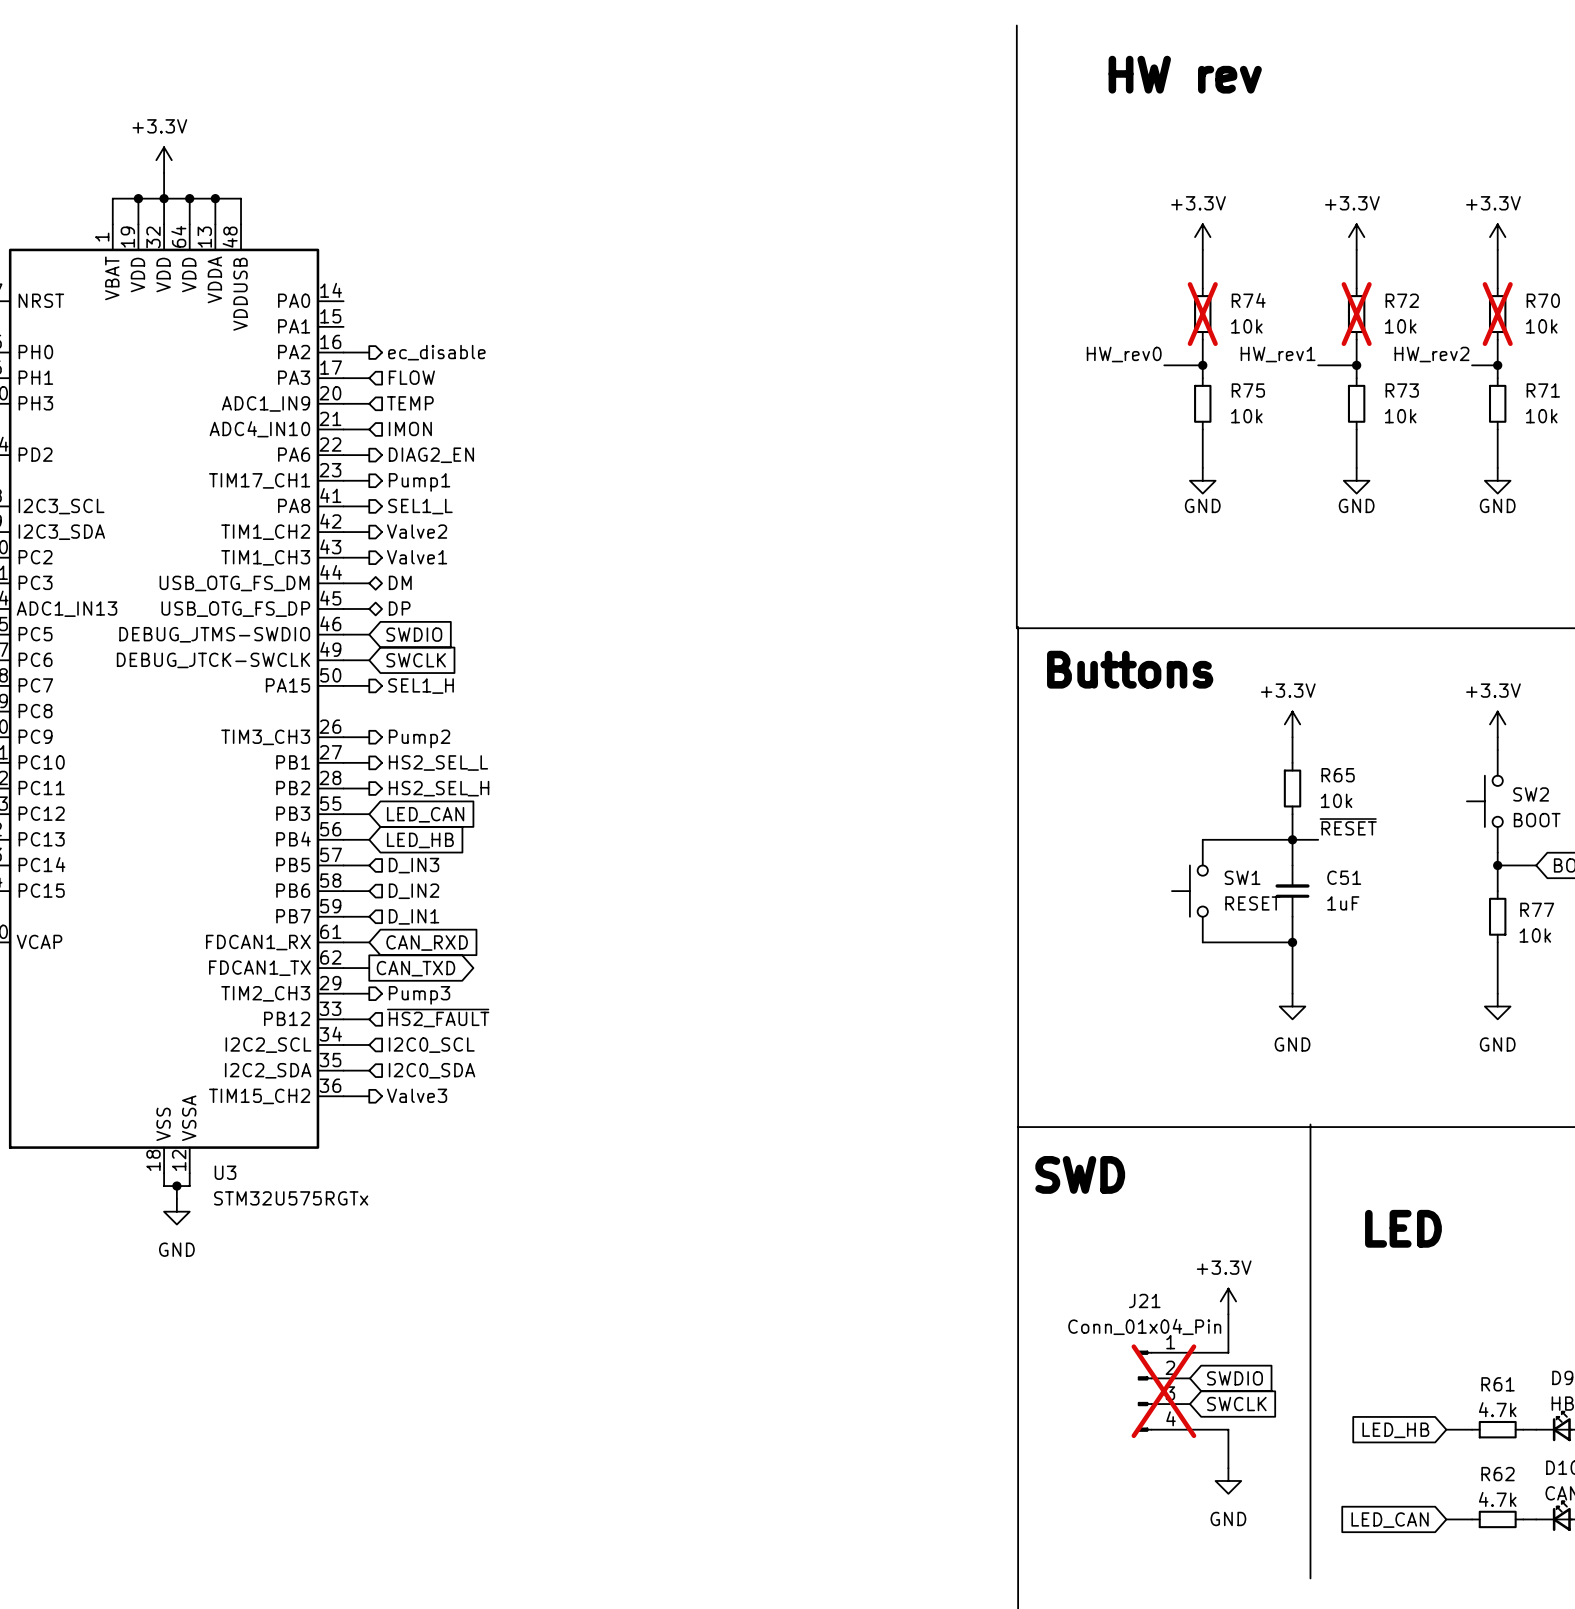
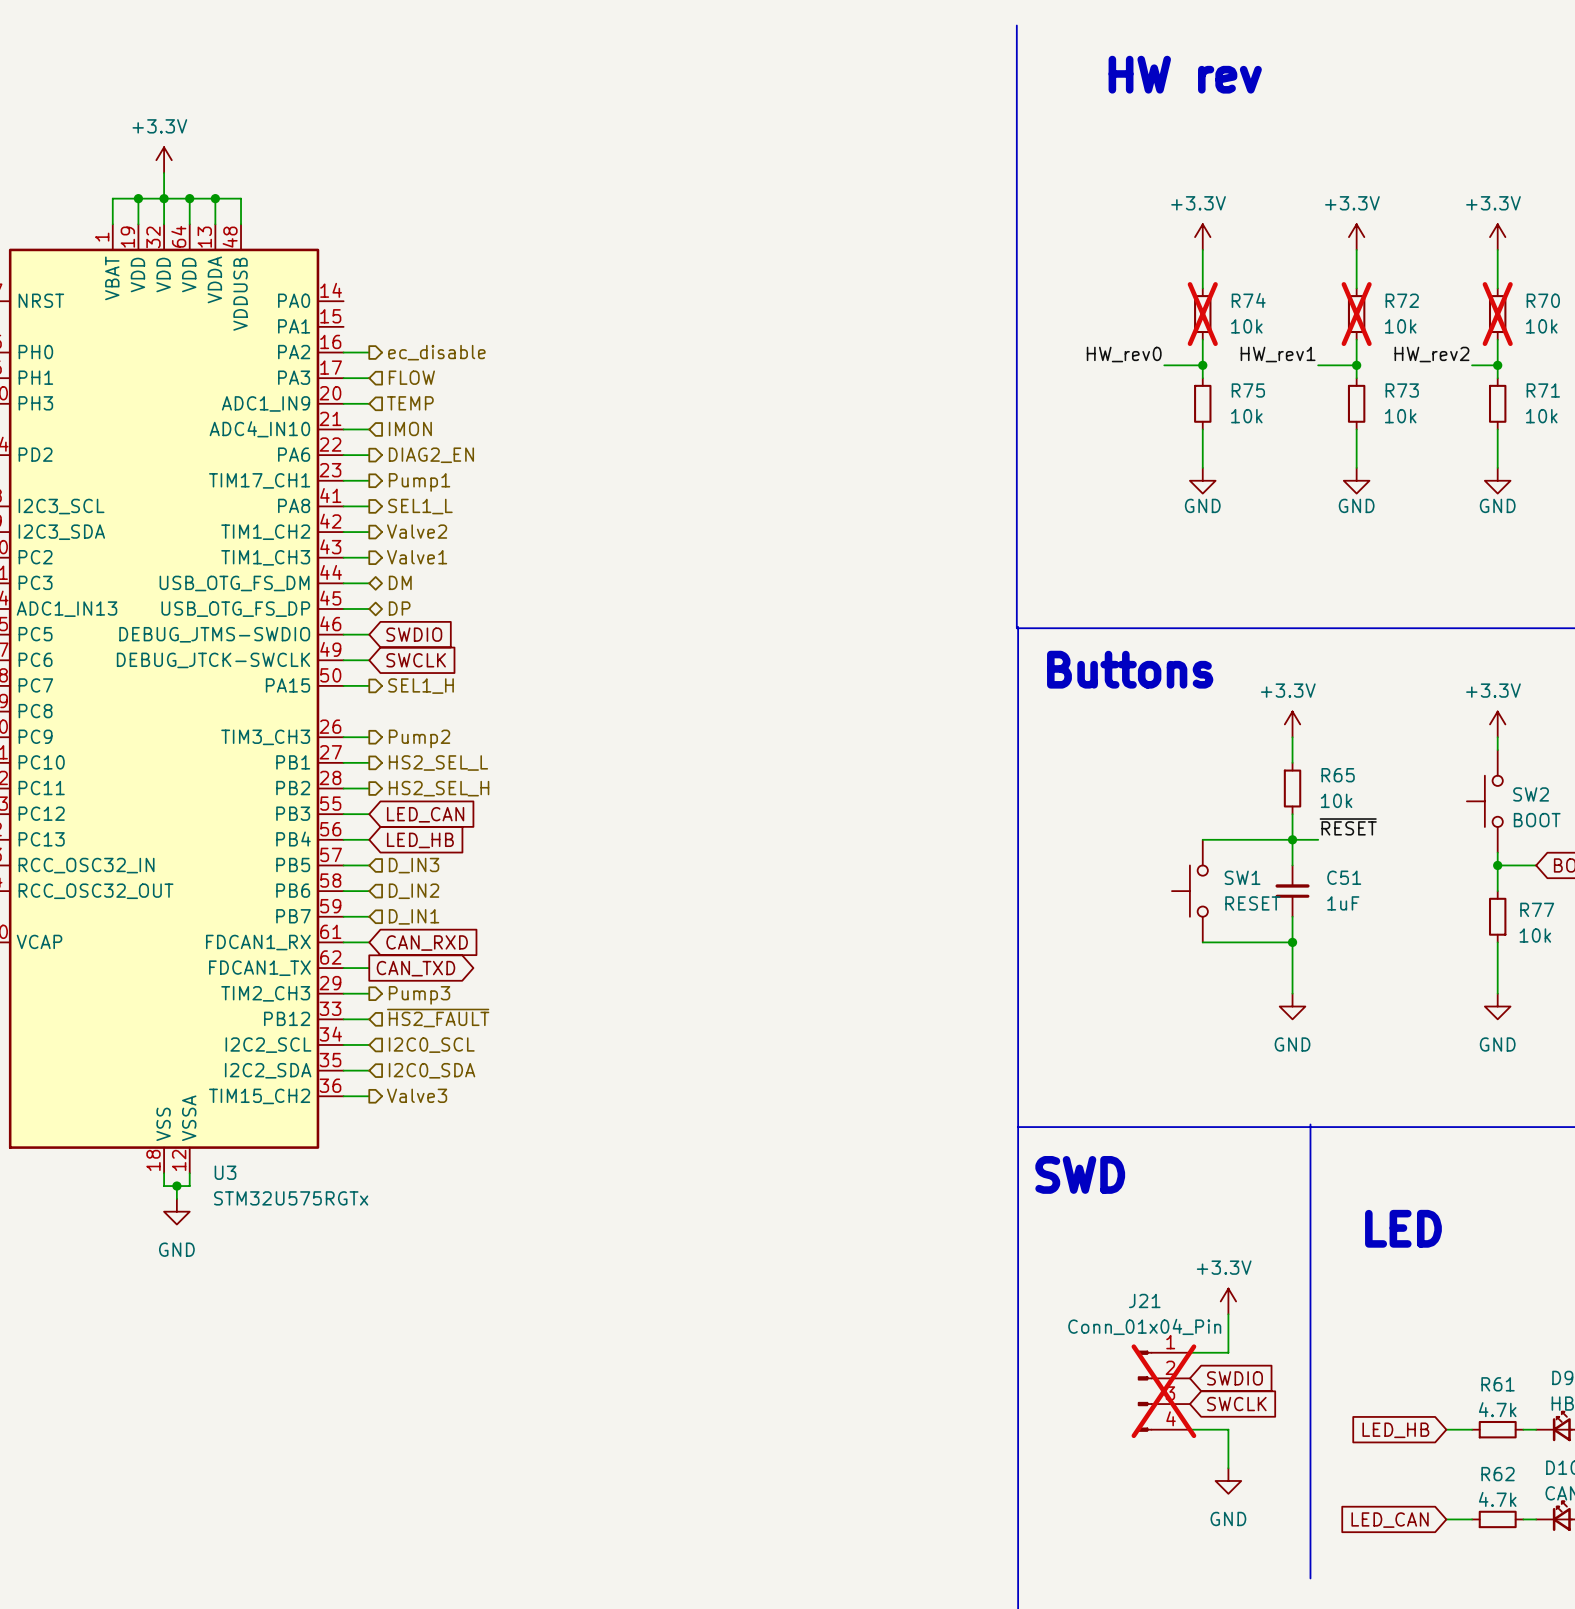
U3 pin name: PC14 (41, 864) -> RCC_OSC32_IN (86, 865)
U3 pin name: PC15 (41, 890) -> RCC_OSC32_OUT (96, 891)

